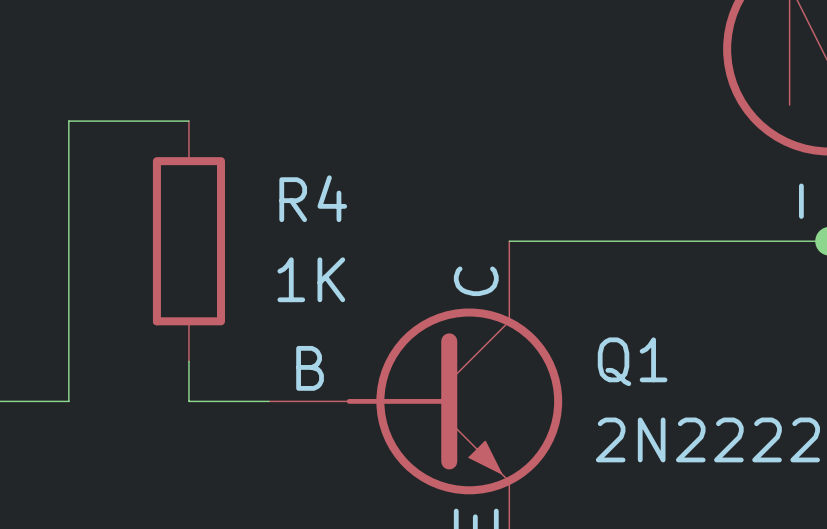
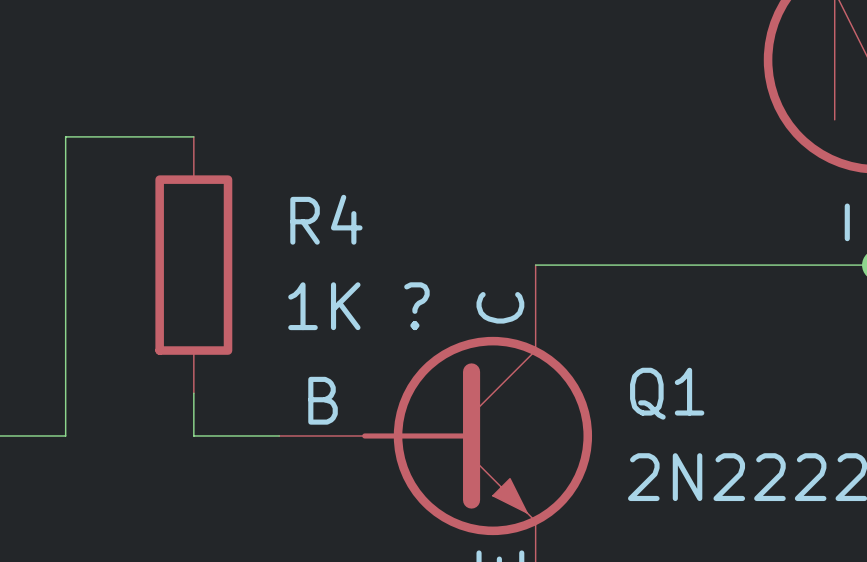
R4 value: 1K (311, 279) -> 1K ? (358, 306)

